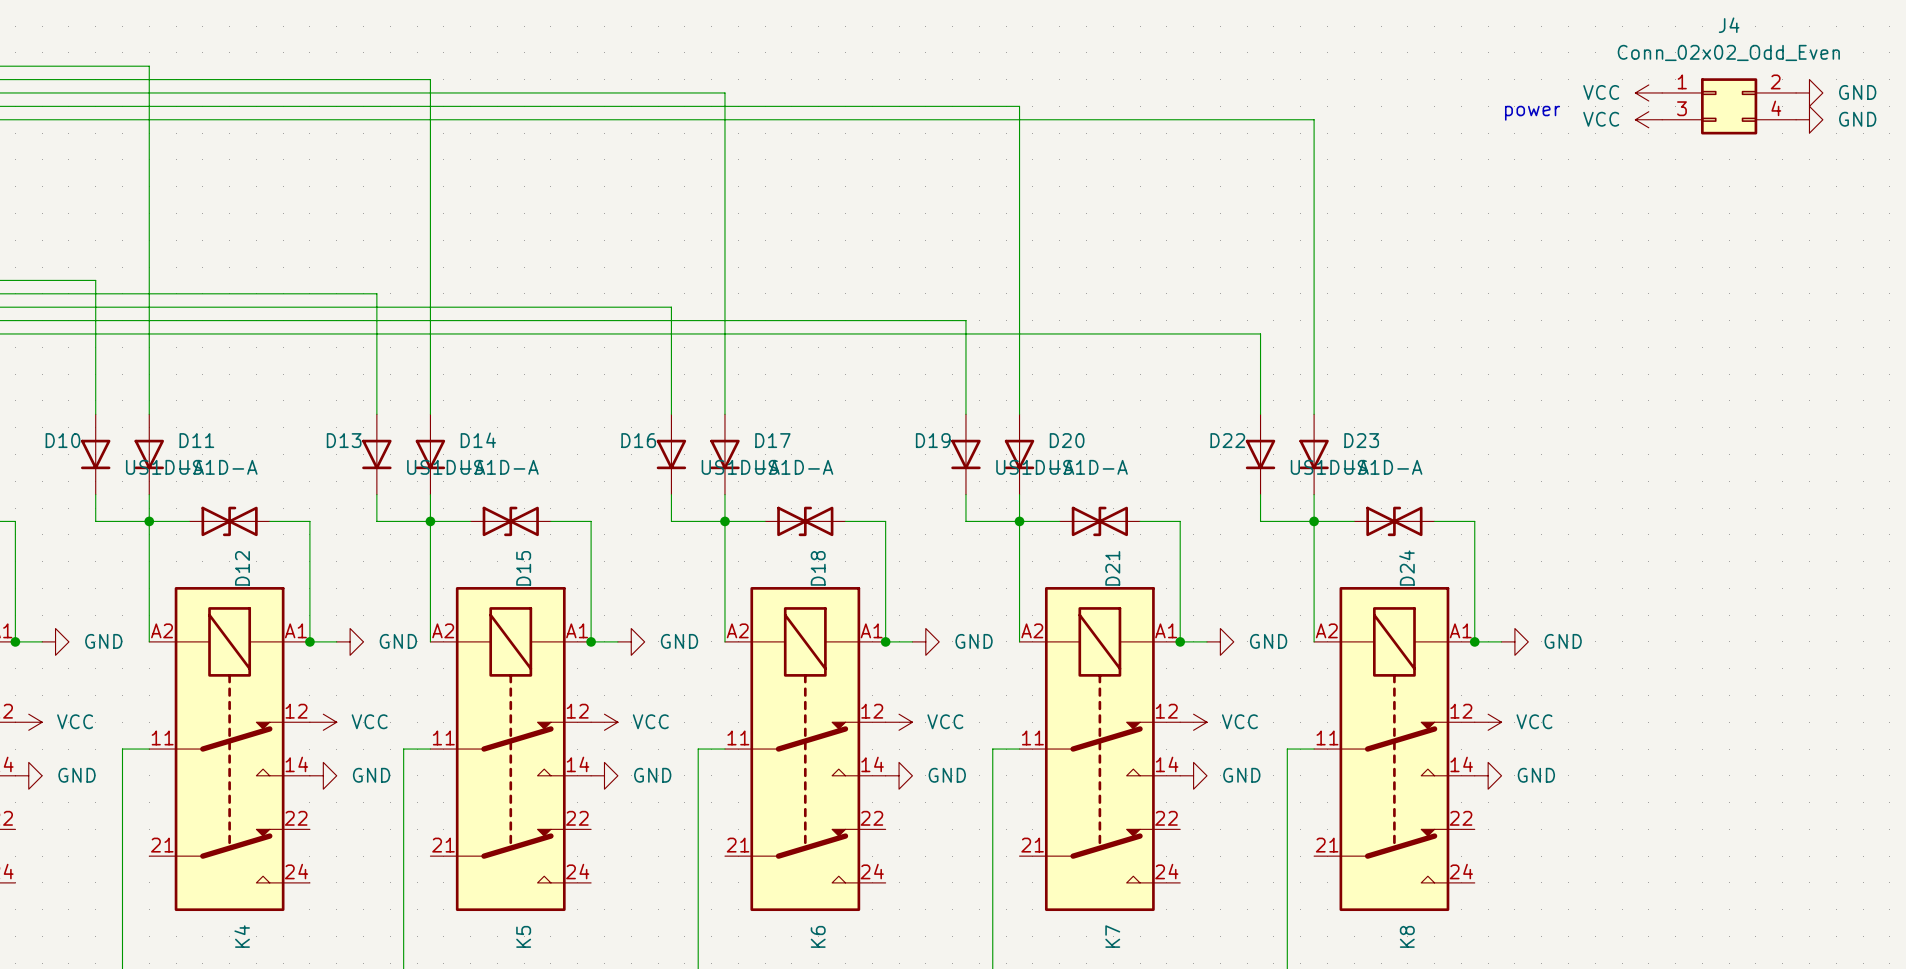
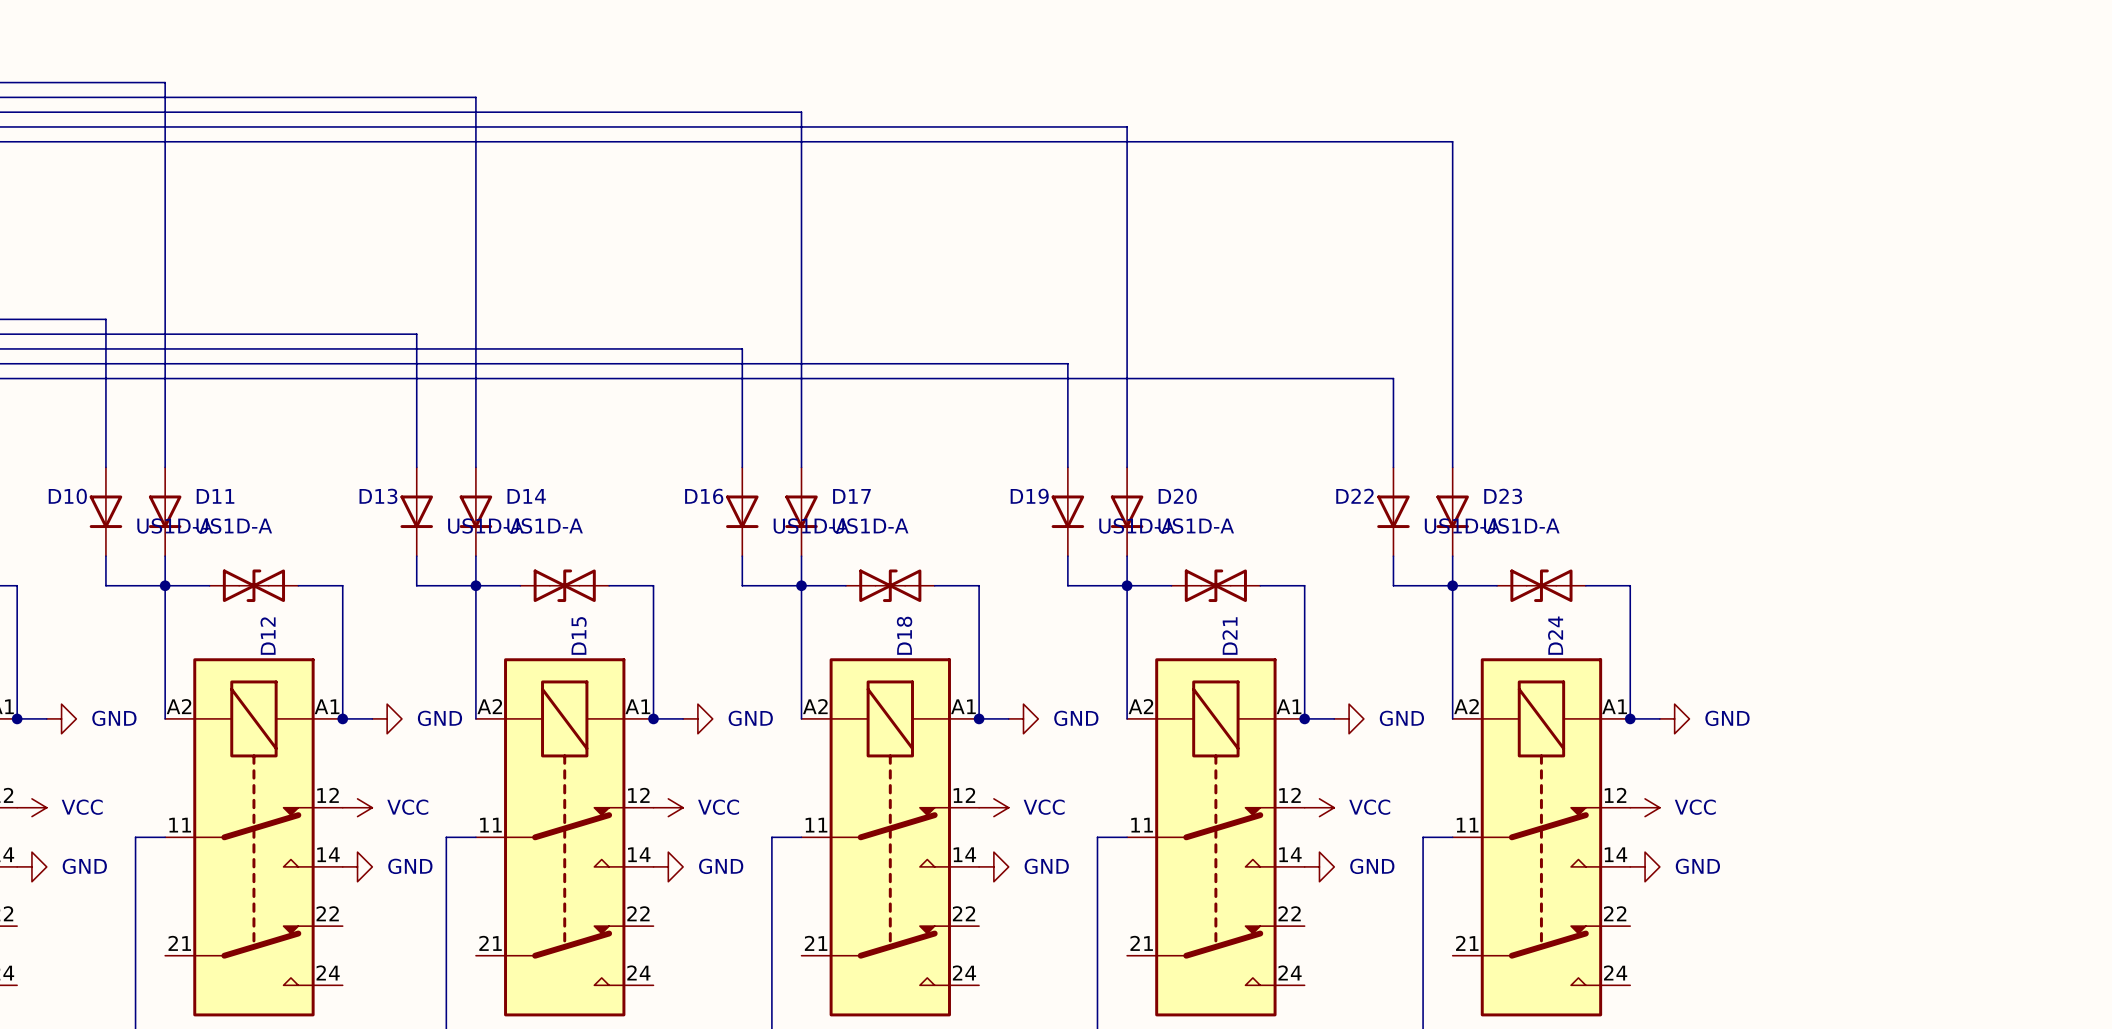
power symbol: VCC (1648, 92) -> none
power symbol: GND (1809, 92) -> none
J4: Conn_02x02_Odd_Even (1729, 106) -> none
text: power (1532, 113) -> none
power symbol: VCC (1648, 119) -> none
power symbol: GND (1809, 119) -> none

